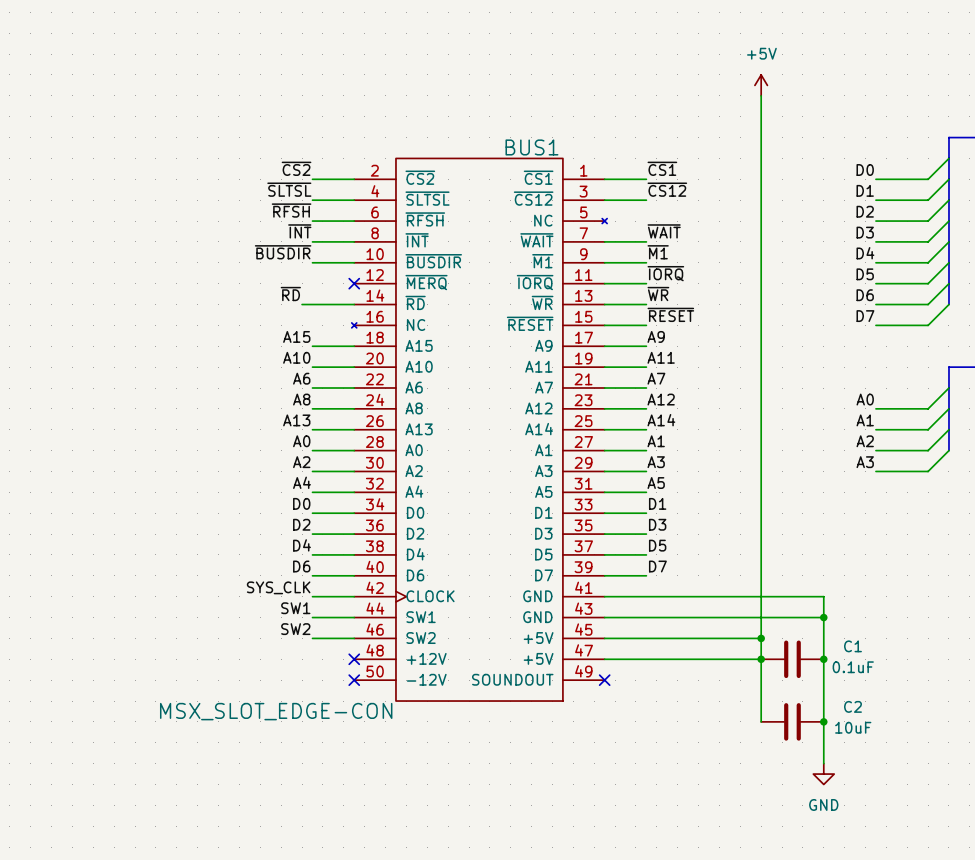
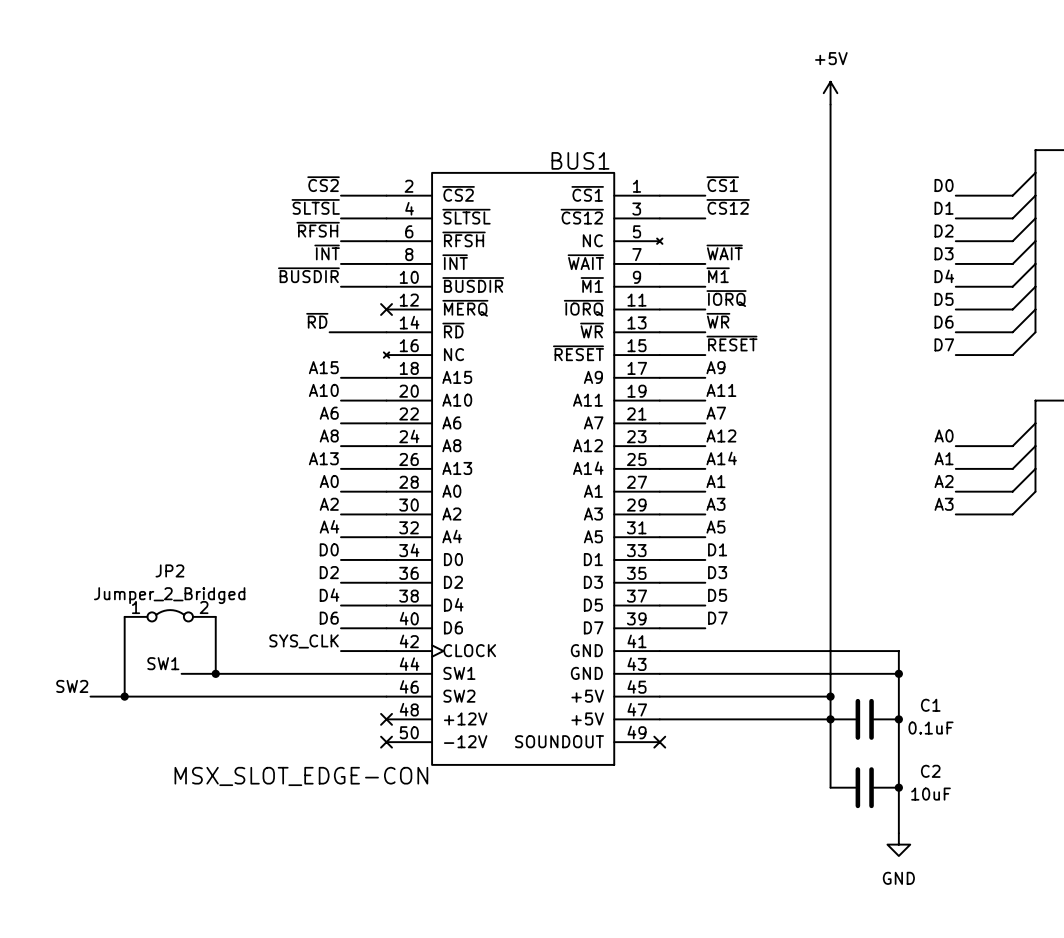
JP2: none -> Jumper_2_Bridged (170, 615)
wire: none -> (124, 616) (124, 696)
wire: none -> (215, 616) (215, 673)
label position: SW1 (295, 608) -> SW1 (163, 663)
wire: none -> (181, 673) (340, 673)
junction: none -> (215, 673)
label: none -> SW2 (72, 686)
label: SW2 (295, 629) -> none
wire: none -> (90, 696) (340, 696)
junction: none -> (124, 696)

